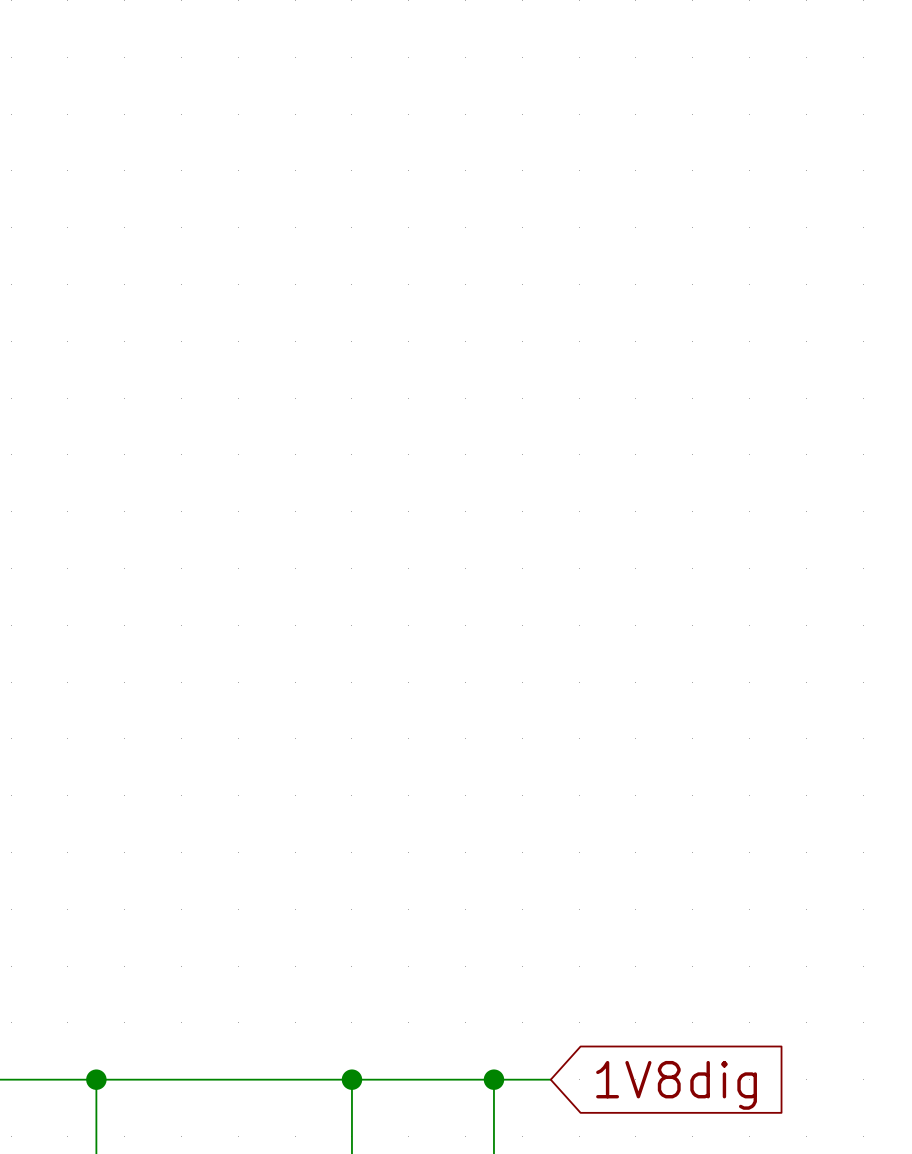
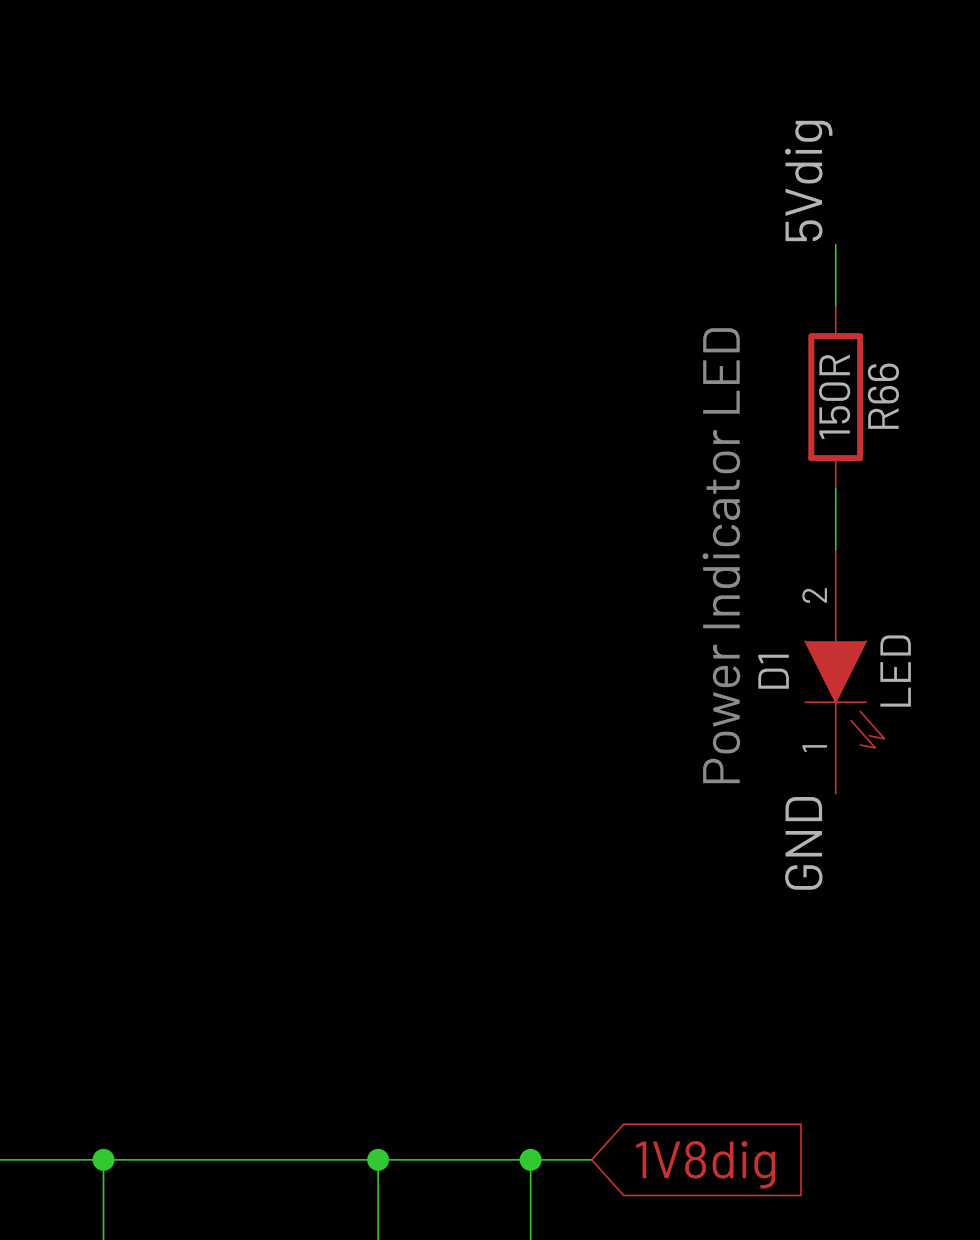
label: none -> 5Vdig (808, 180)
wire: none -> (835, 244) (835, 305)
R66: none -> 150R (835, 397)
wire: none -> (835, 488) (835, 549)
text: none -> Power Indicator LED (721, 555)
D1: none -> LED (844, 671)
label: none -> GND (803, 843)

